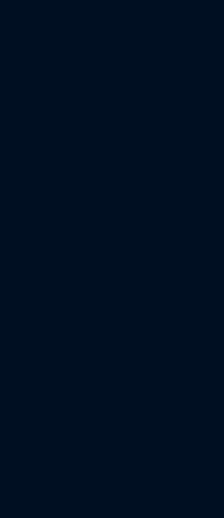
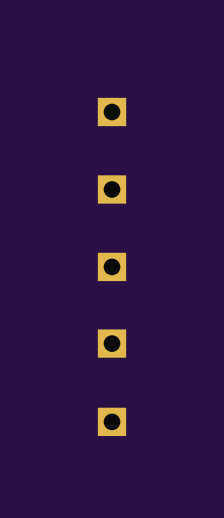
part: none -> (112, 112)
part: none -> (112, 189)
part: none -> (112, 266)
part: none -> (112, 343)
part: none -> (112, 421)

